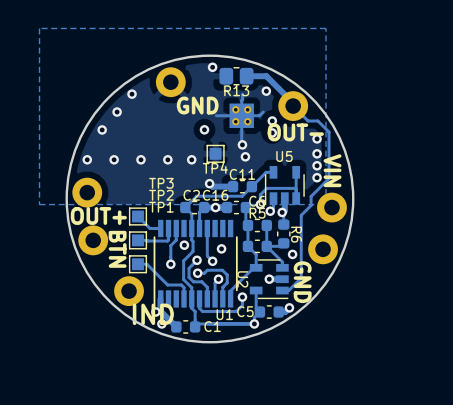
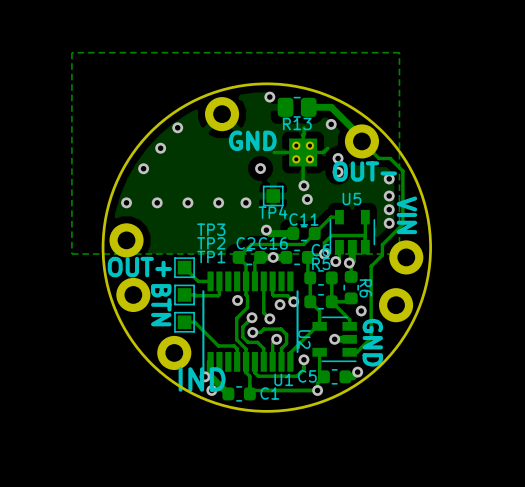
track: (176, 228) (176, 240) (170, 245) (170, 264) -> none
track: none -> (272, 281) (273, 295) (287, 295) (293, 301)
via position: (170, 264) -> (293, 301)

